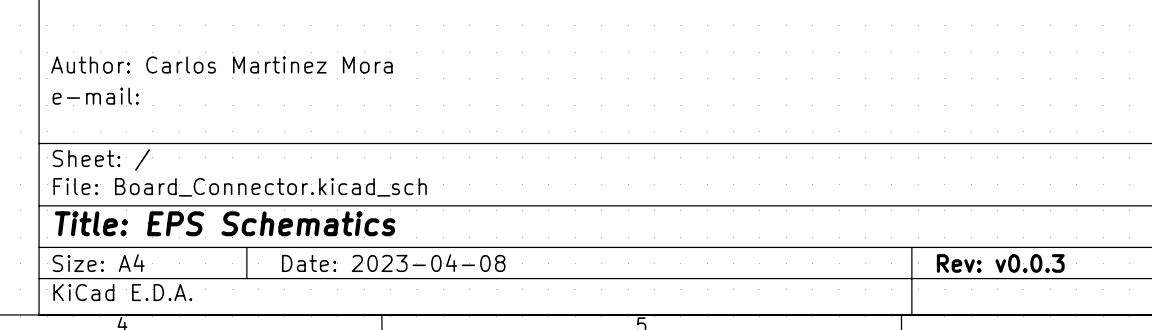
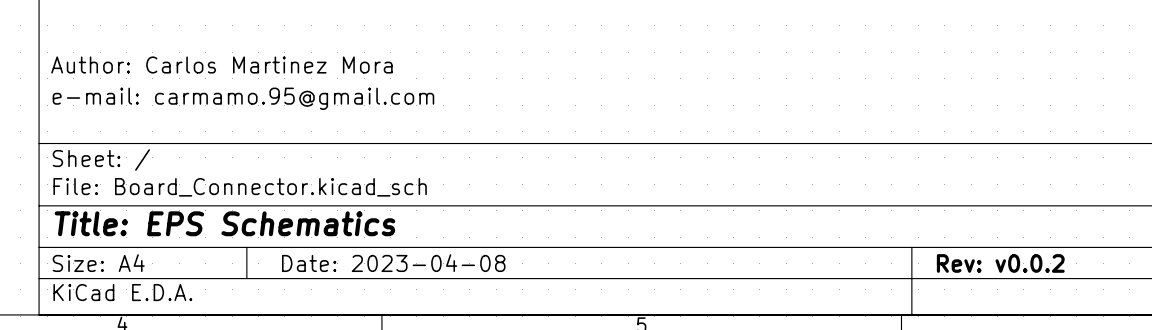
title block: e-mail: (95, 96) -> e-mail: carmamo.95@gmail.com (243, 98)
title block: Rev: v0.0.3 (1000, 263) -> Rev: v0.0.2 (1000, 263)

